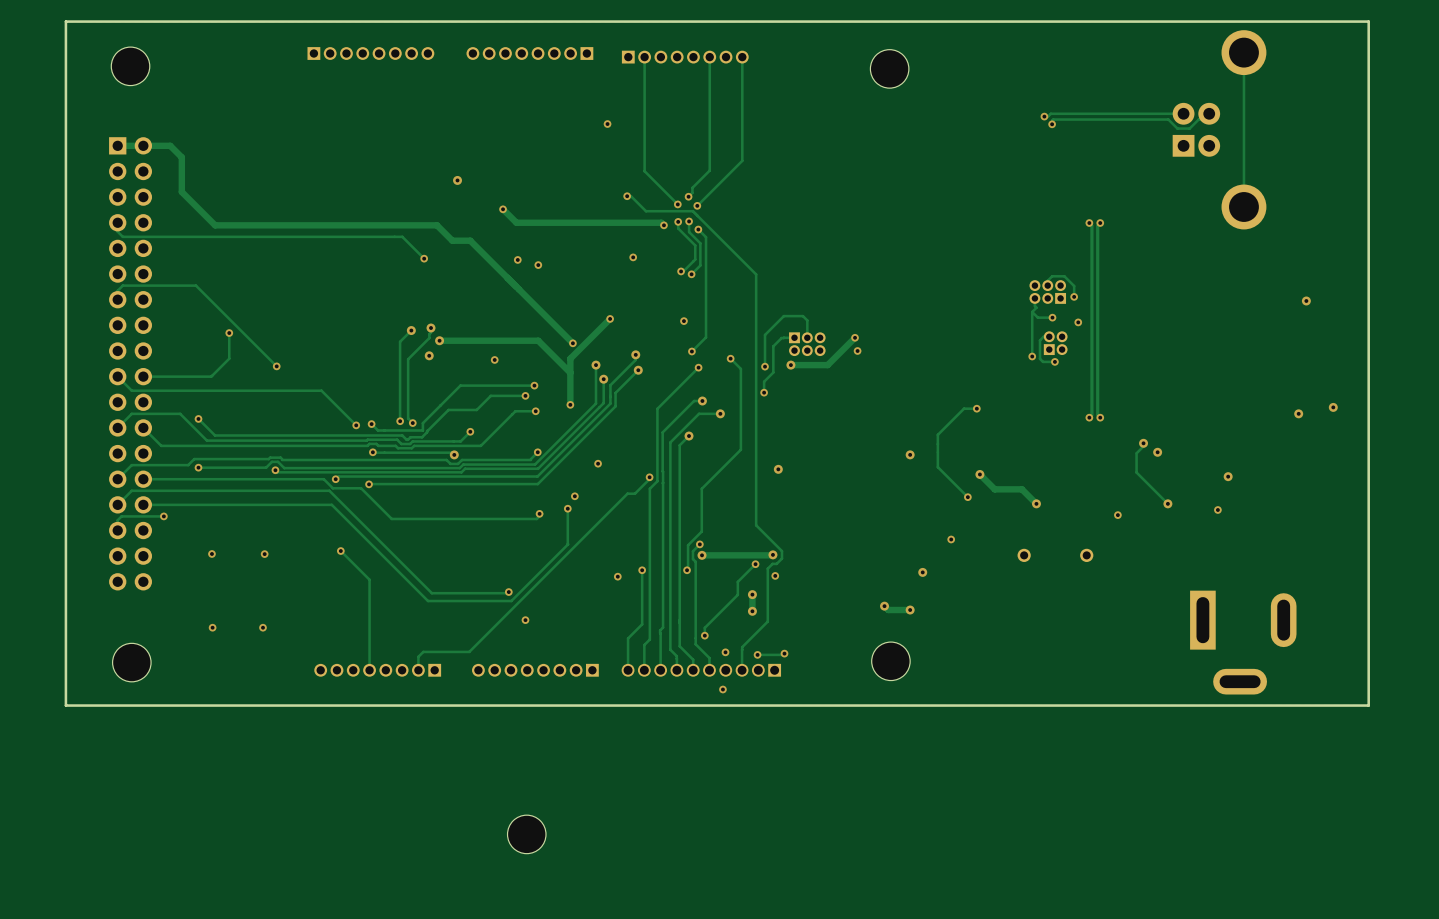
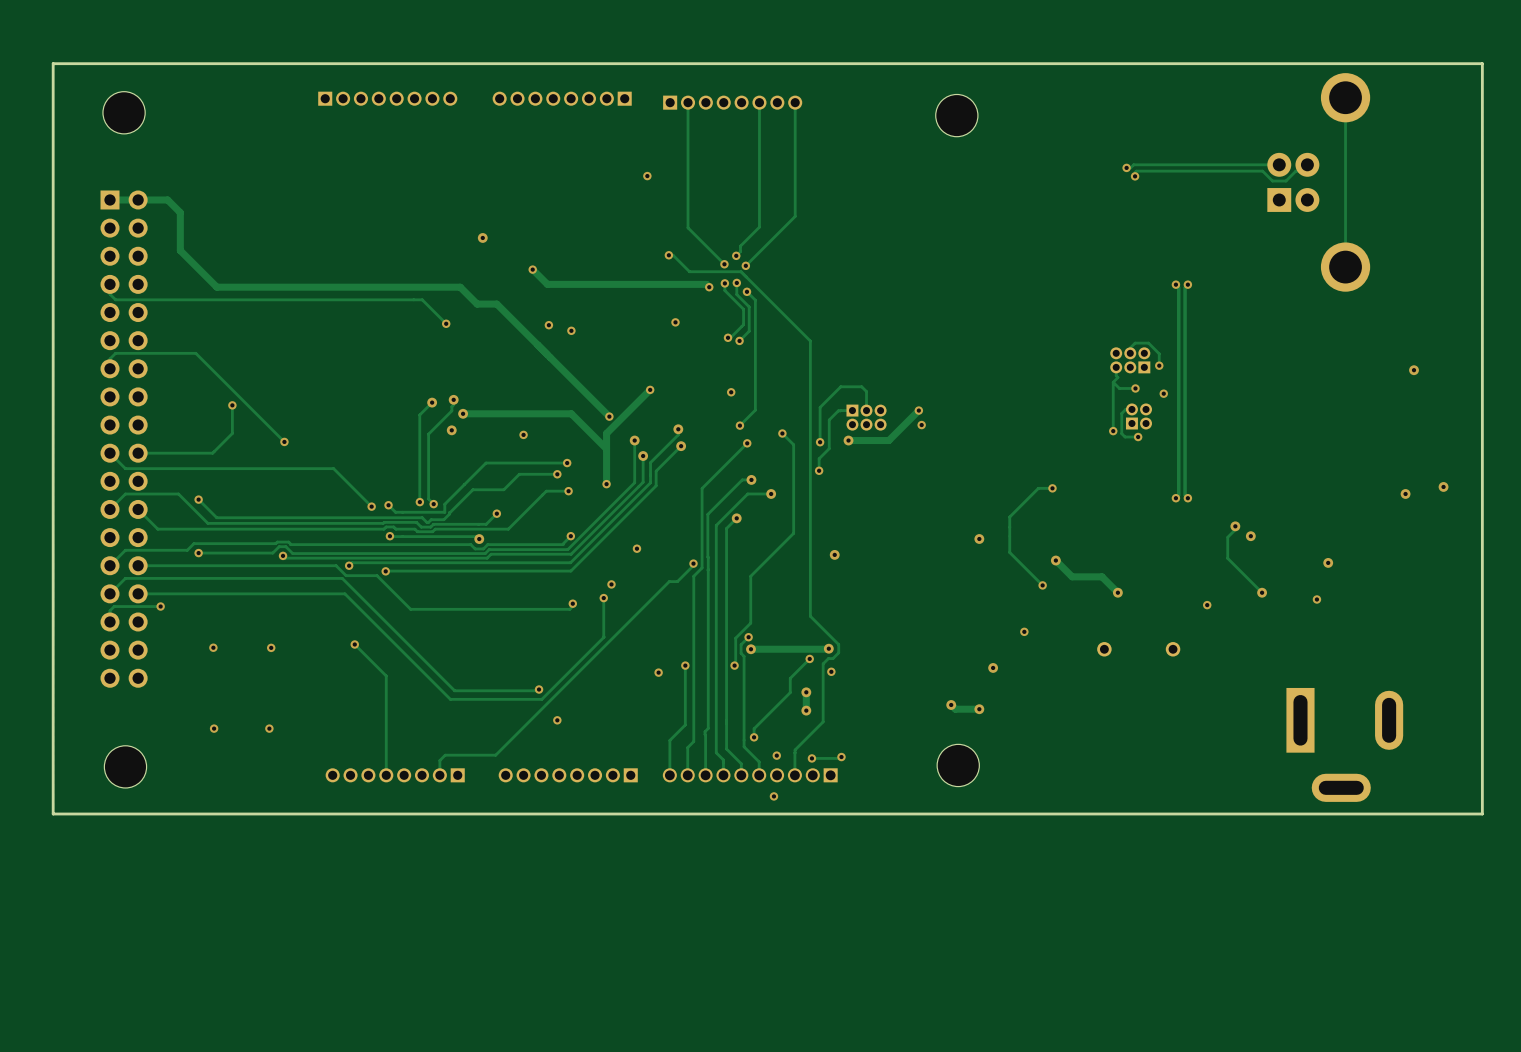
part: (526, 834) -> none

